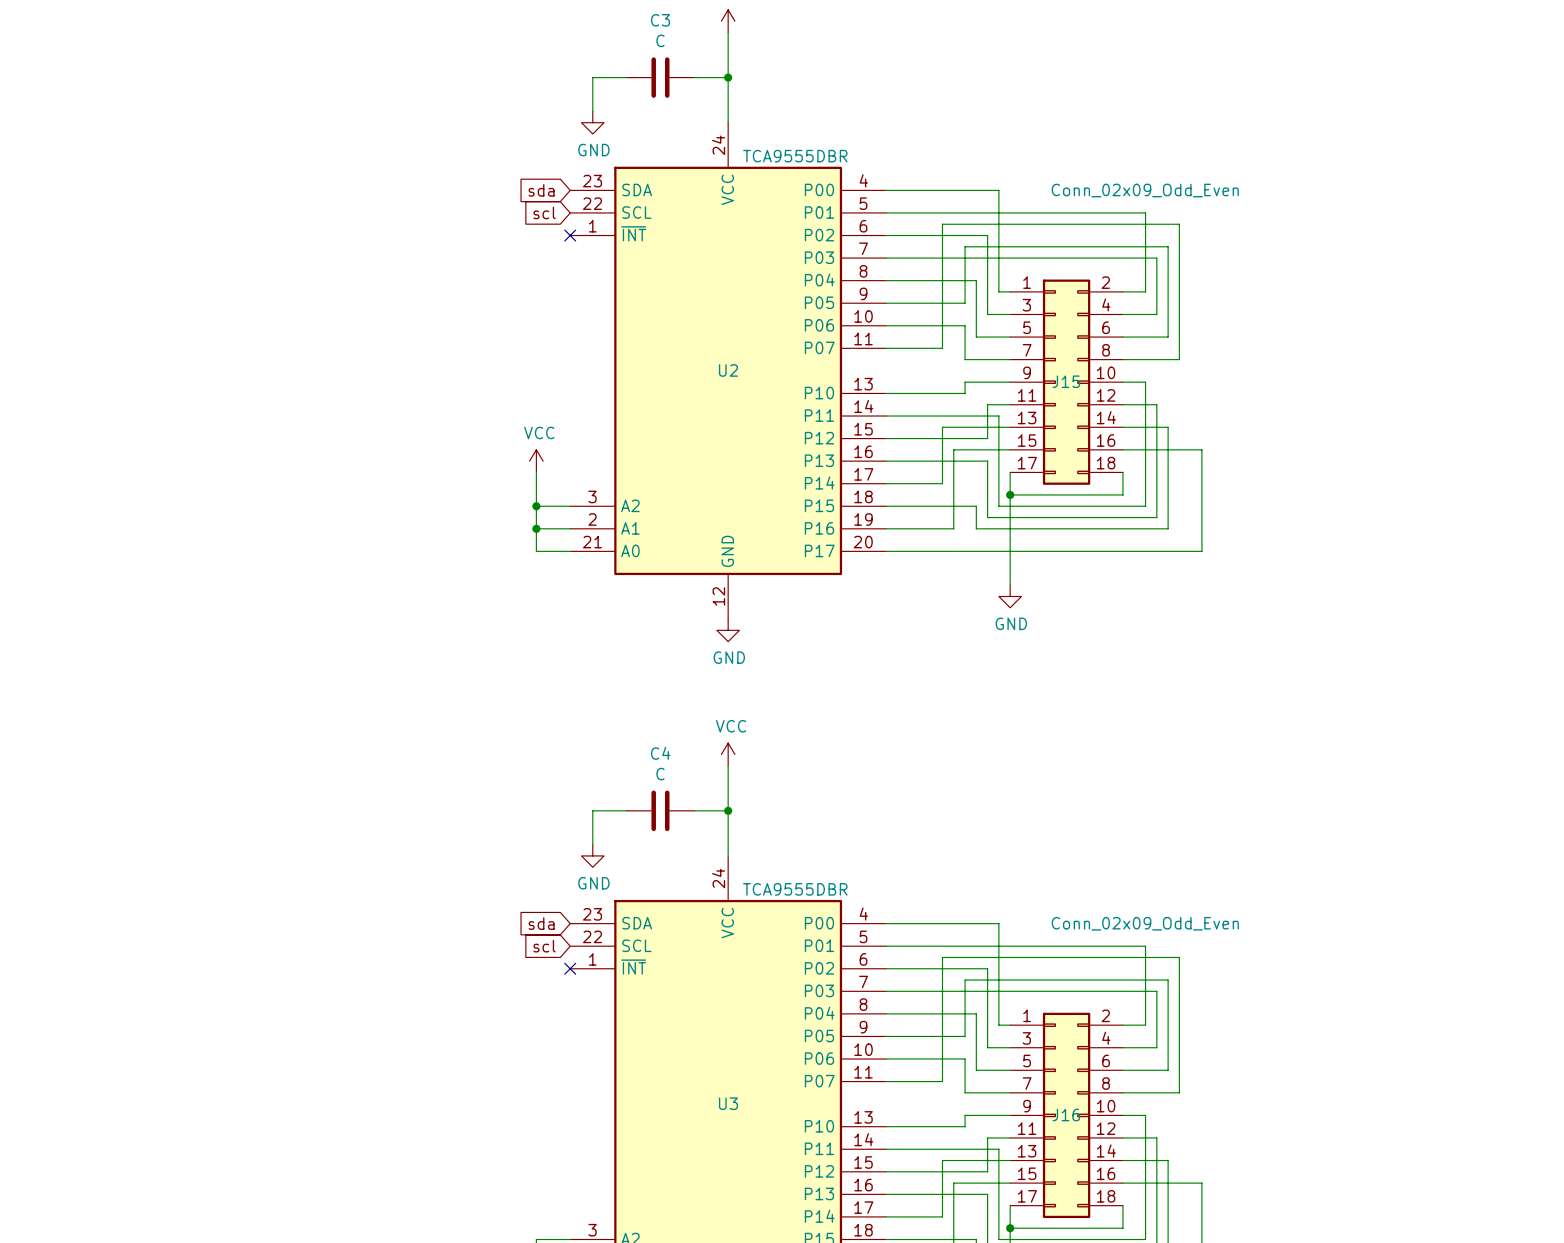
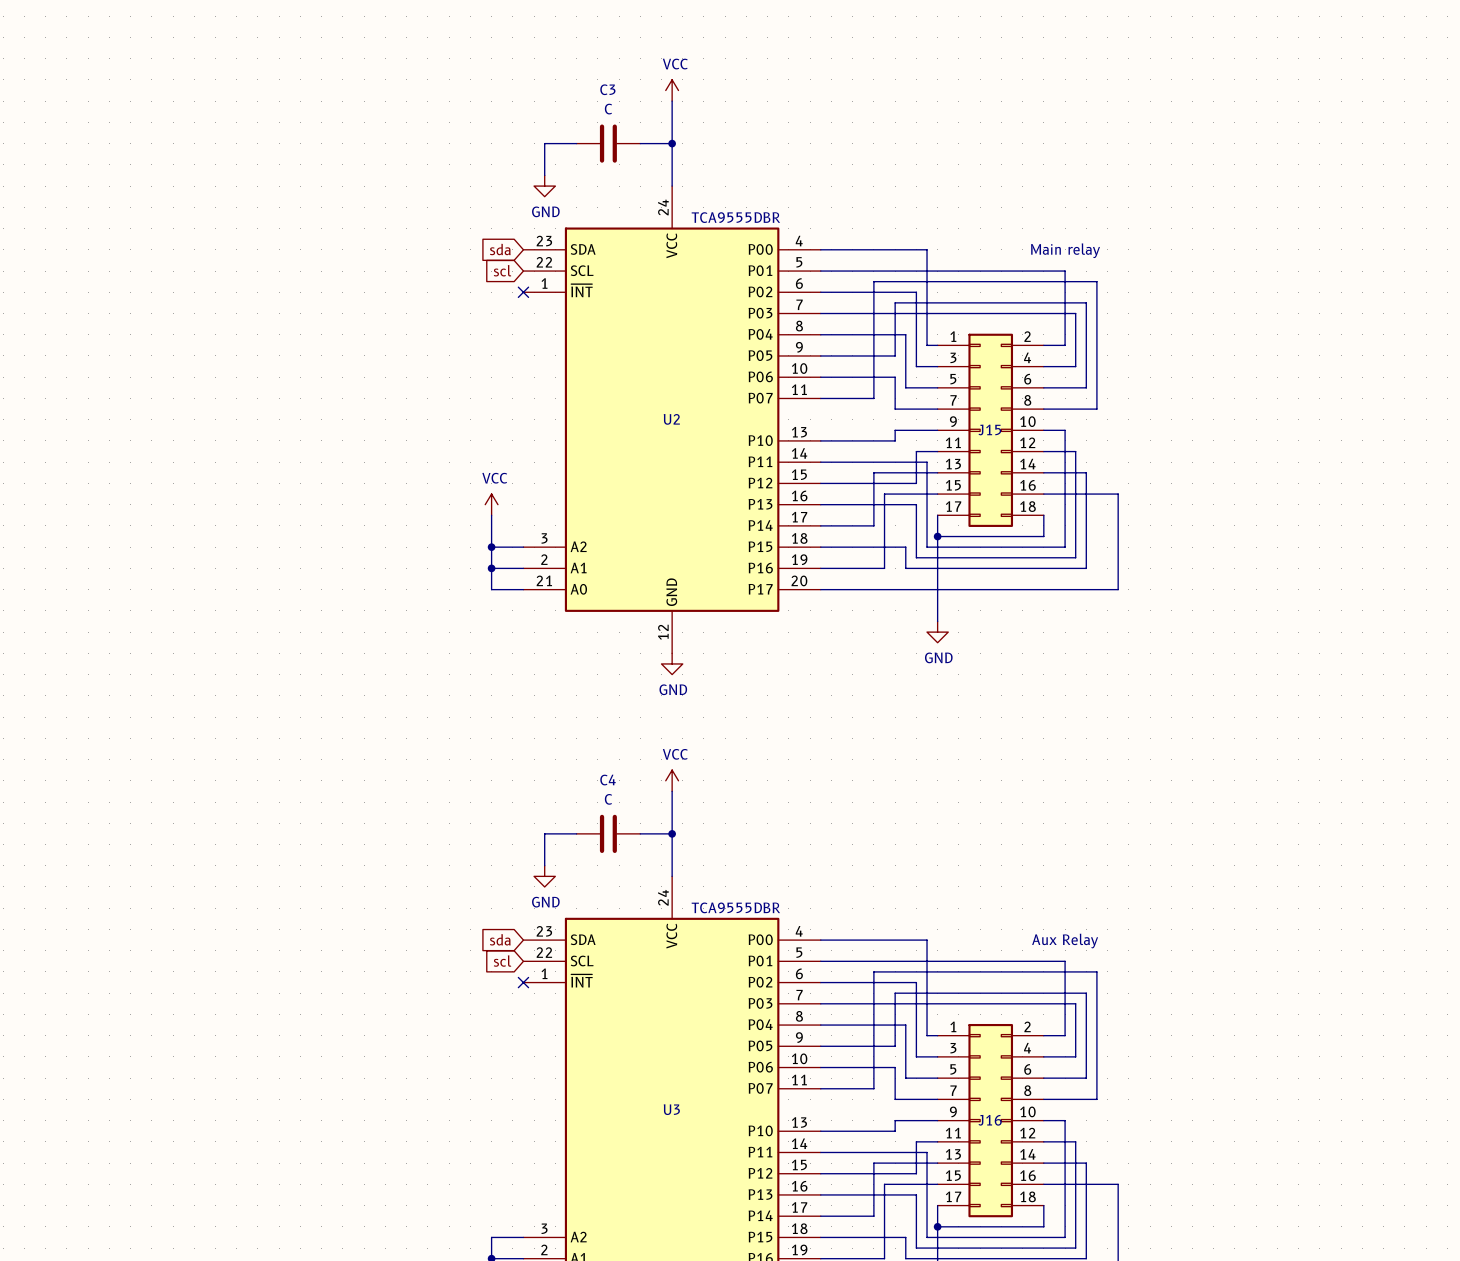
J15 value: Conn_02x09_Odd_Even (1145, 190) -> Main relay (1065, 250)
J16 value: Conn_02x09_Odd_Even (1145, 923) -> Aux Relay (1065, 941)

